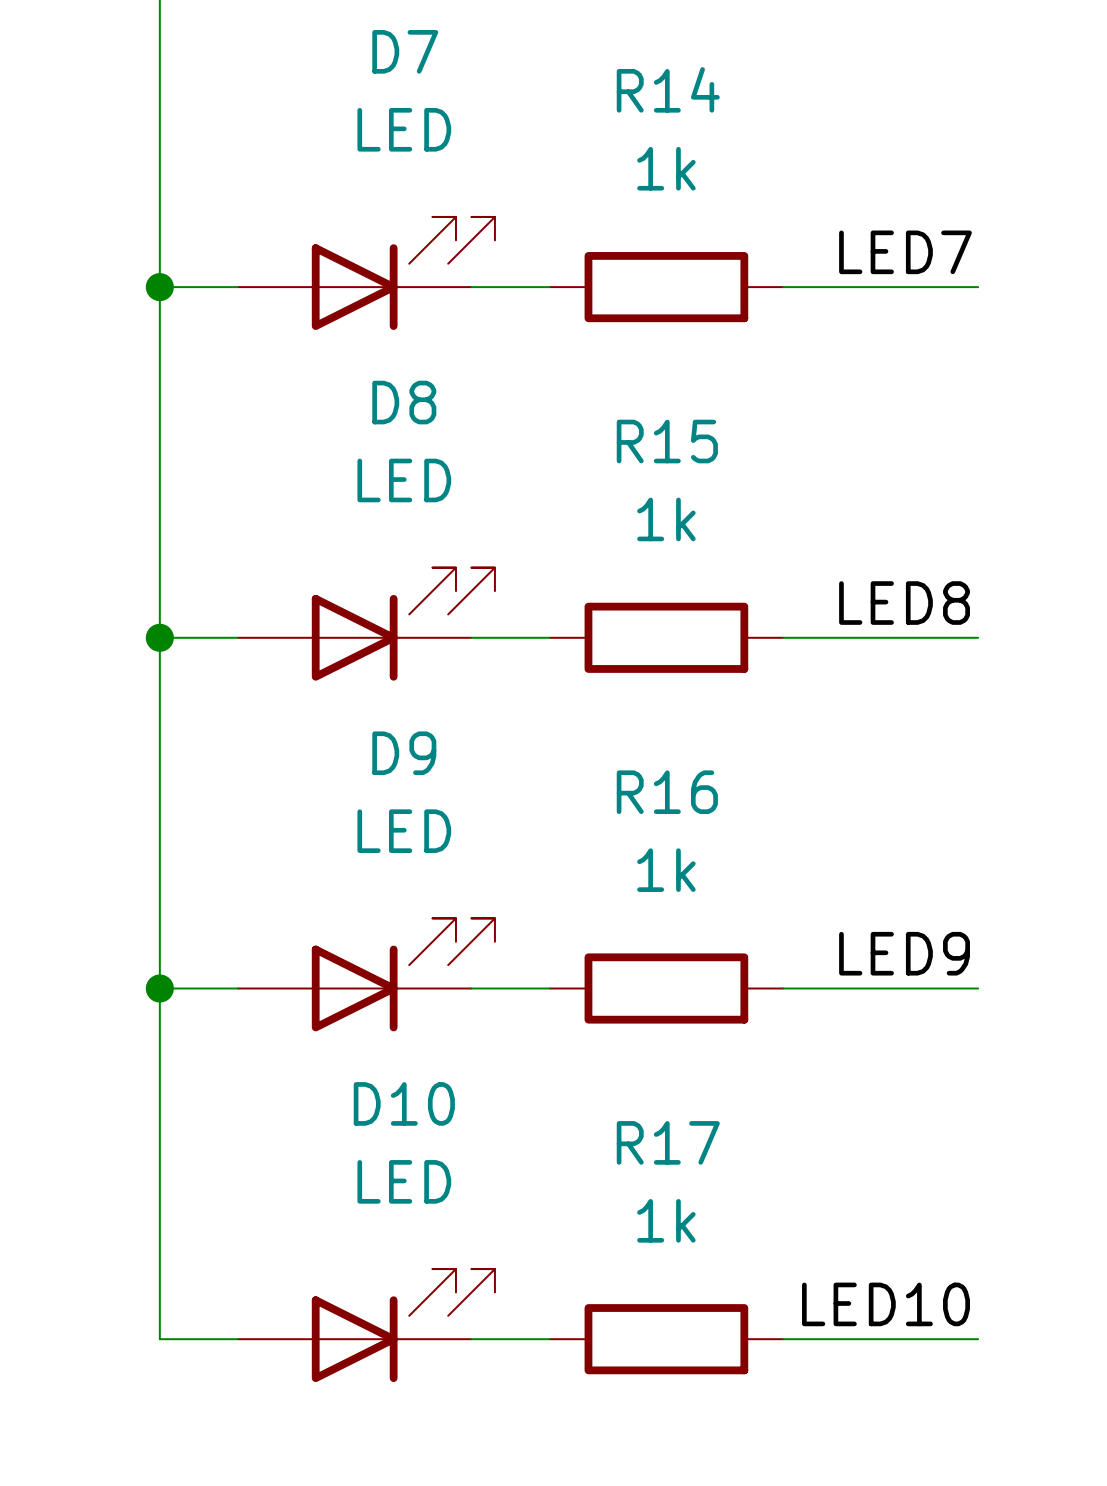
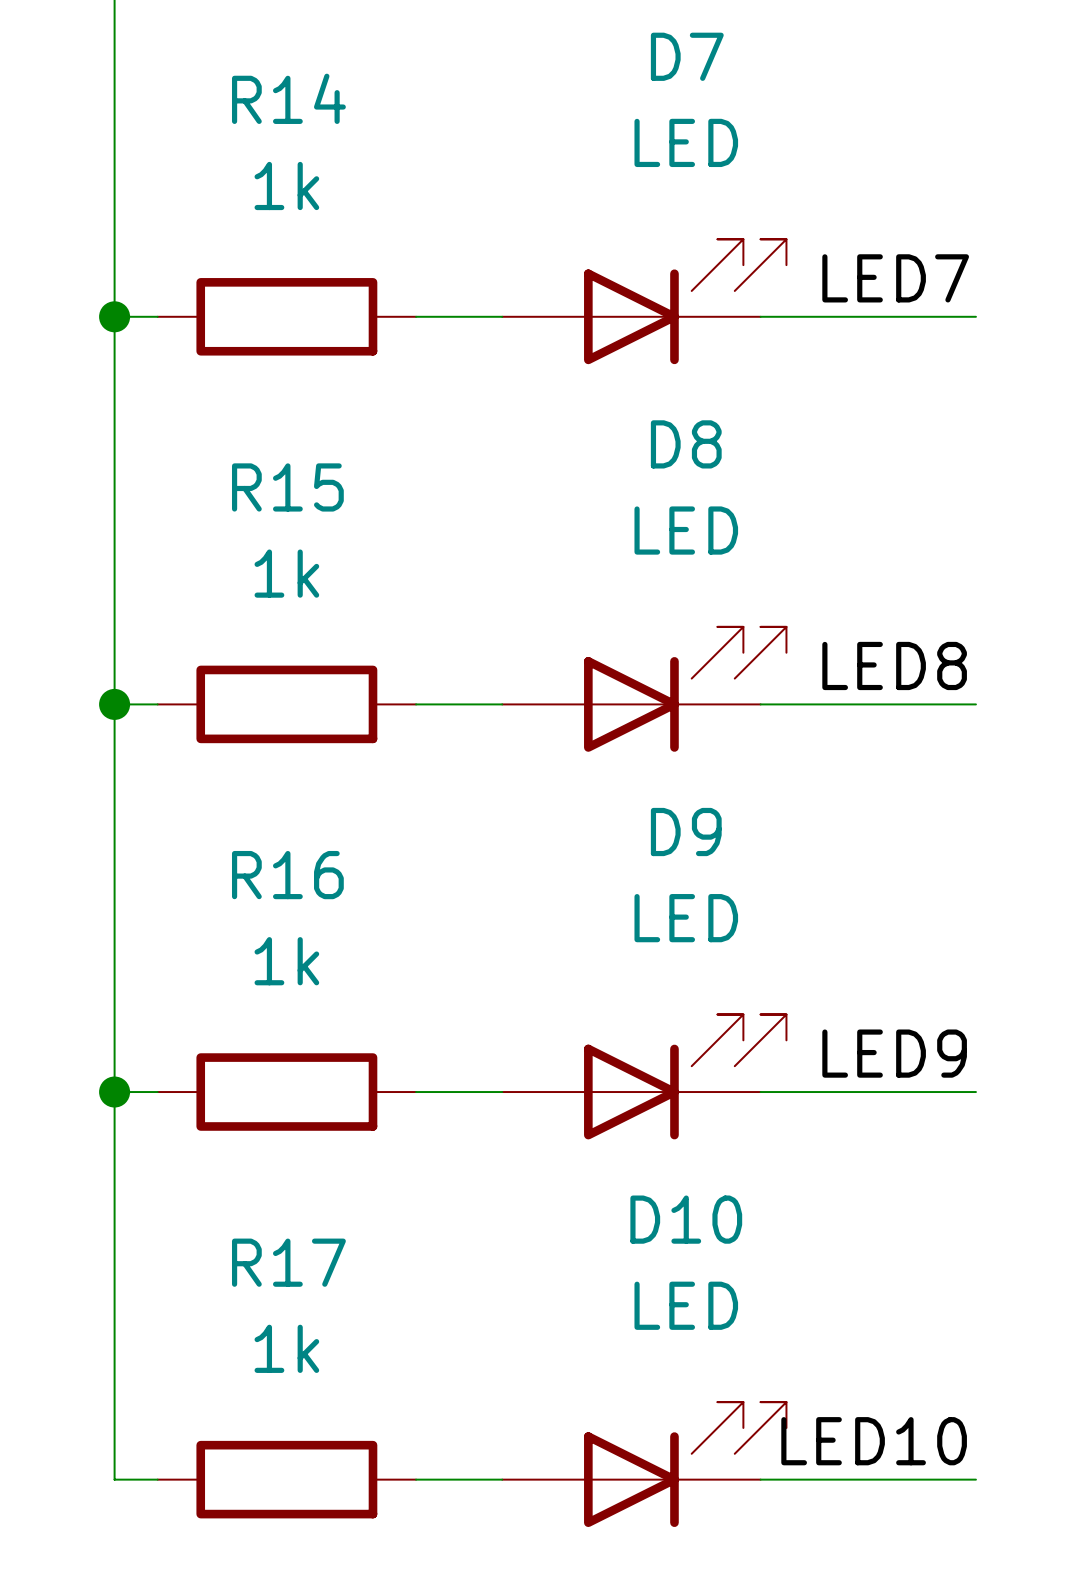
label position: LED7 (905, 252) -> LED7 (895, 278)
D7 position: (366, 273) -> (644, 301)
R14 position: (666, 287) -> (286, 316)
wire: (939, 287) (978, 287) -> none
label position: LED8 (904, 603) -> LED8 (894, 665)
D8 position: (366, 624) -> (644, 689)
R15 position: (666, 637) -> (286, 704)
wire: (939, 637) (978, 637) -> none
label position: LED9 (904, 953) -> LED9 (894, 1053)
D9 position: (366, 974) -> (644, 1076)
R16 position: (666, 988) -> (286, 1092)
wire: (939, 988) (978, 988) -> none
label position: LED10 (885, 1304) -> LED10 (874, 1441)
D10 position: (366, 1325) -> (644, 1464)
R17 position: (666, 1339) -> (286, 1479)
wire: (939, 1339) (978, 1339) -> none

